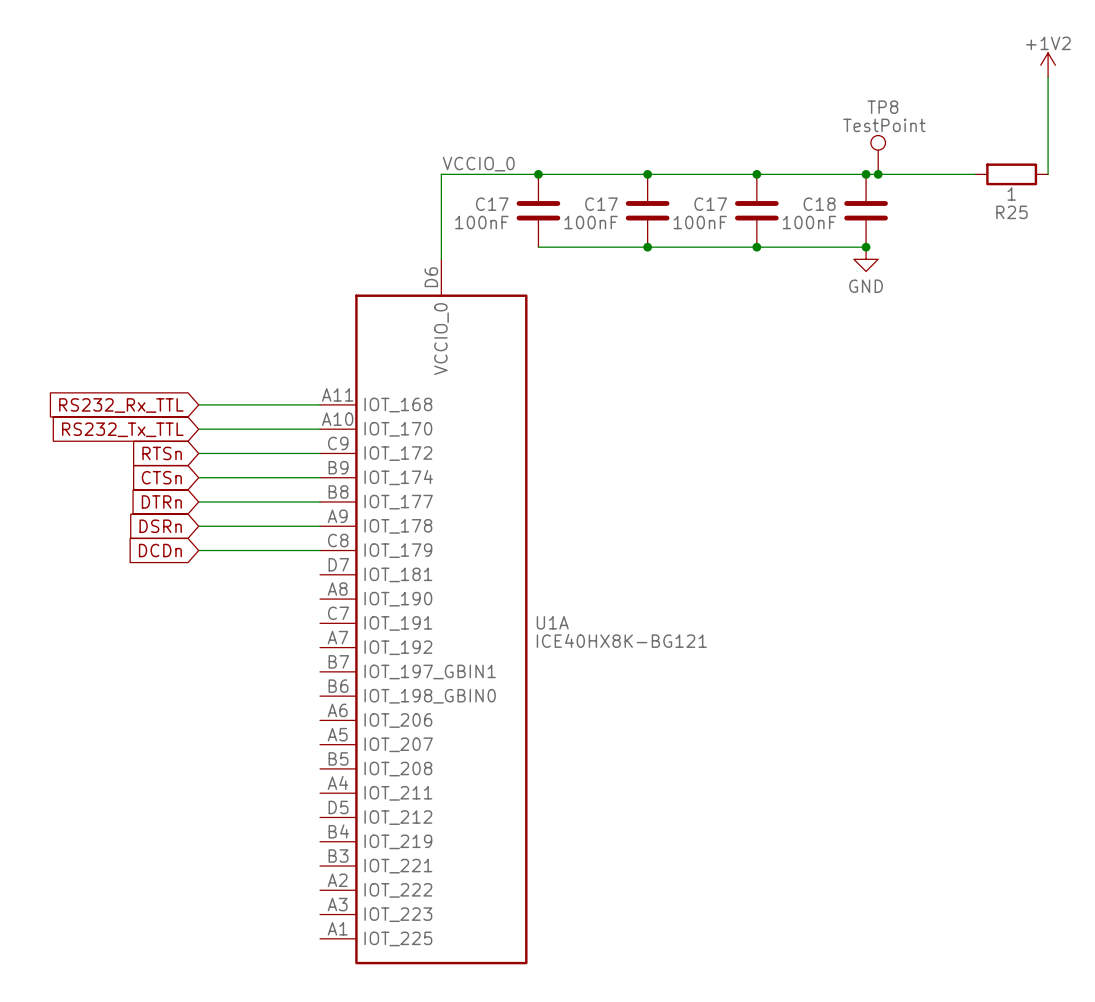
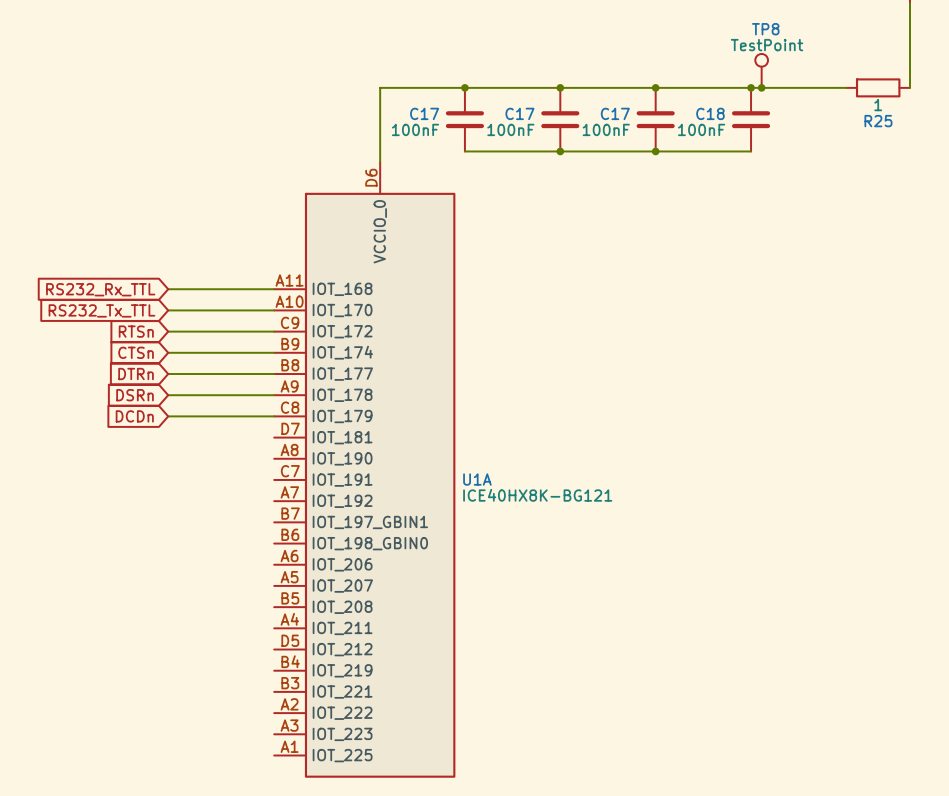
label: VCCIO_0 (478, 164) -> none
junction: (866, 247) -> none
power symbol: GND (866, 259) -> none

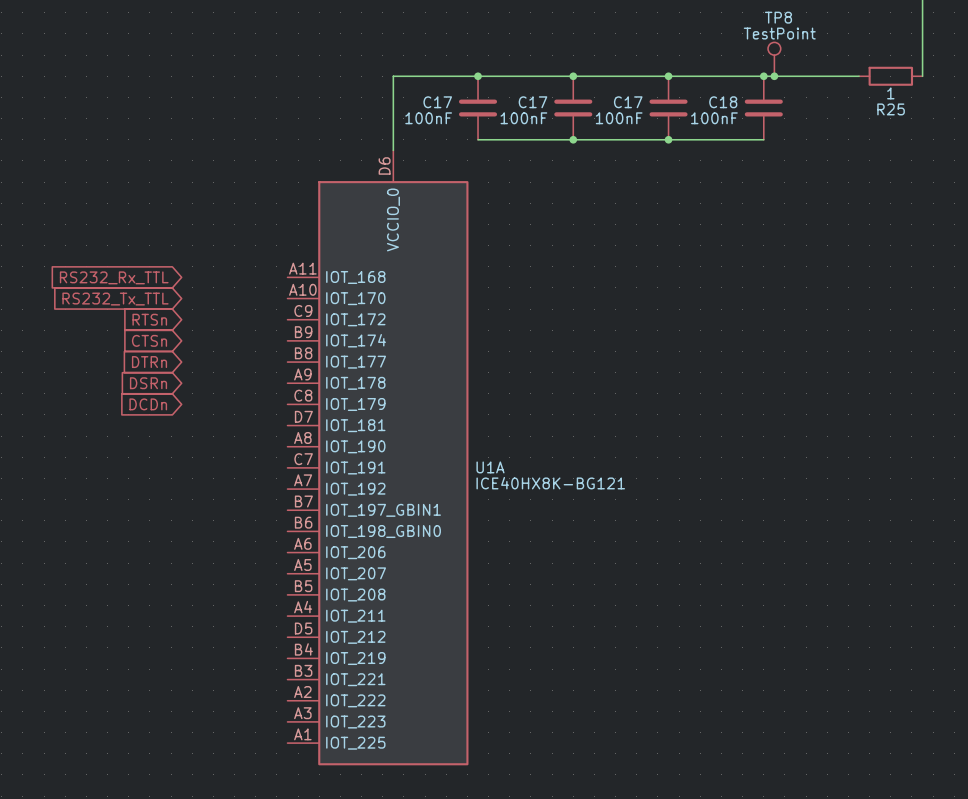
wire: (168, 289) (274, 289) -> none
wire: (168, 310) (274, 310) -> none
wire: (168, 331) (274, 331) -> none
wire: (168, 352) (274, 352) -> none
wire: (168, 374) (274, 374) -> none
wire: (168, 395) (274, 395) -> none
wire: (168, 416) (274, 416) -> none

